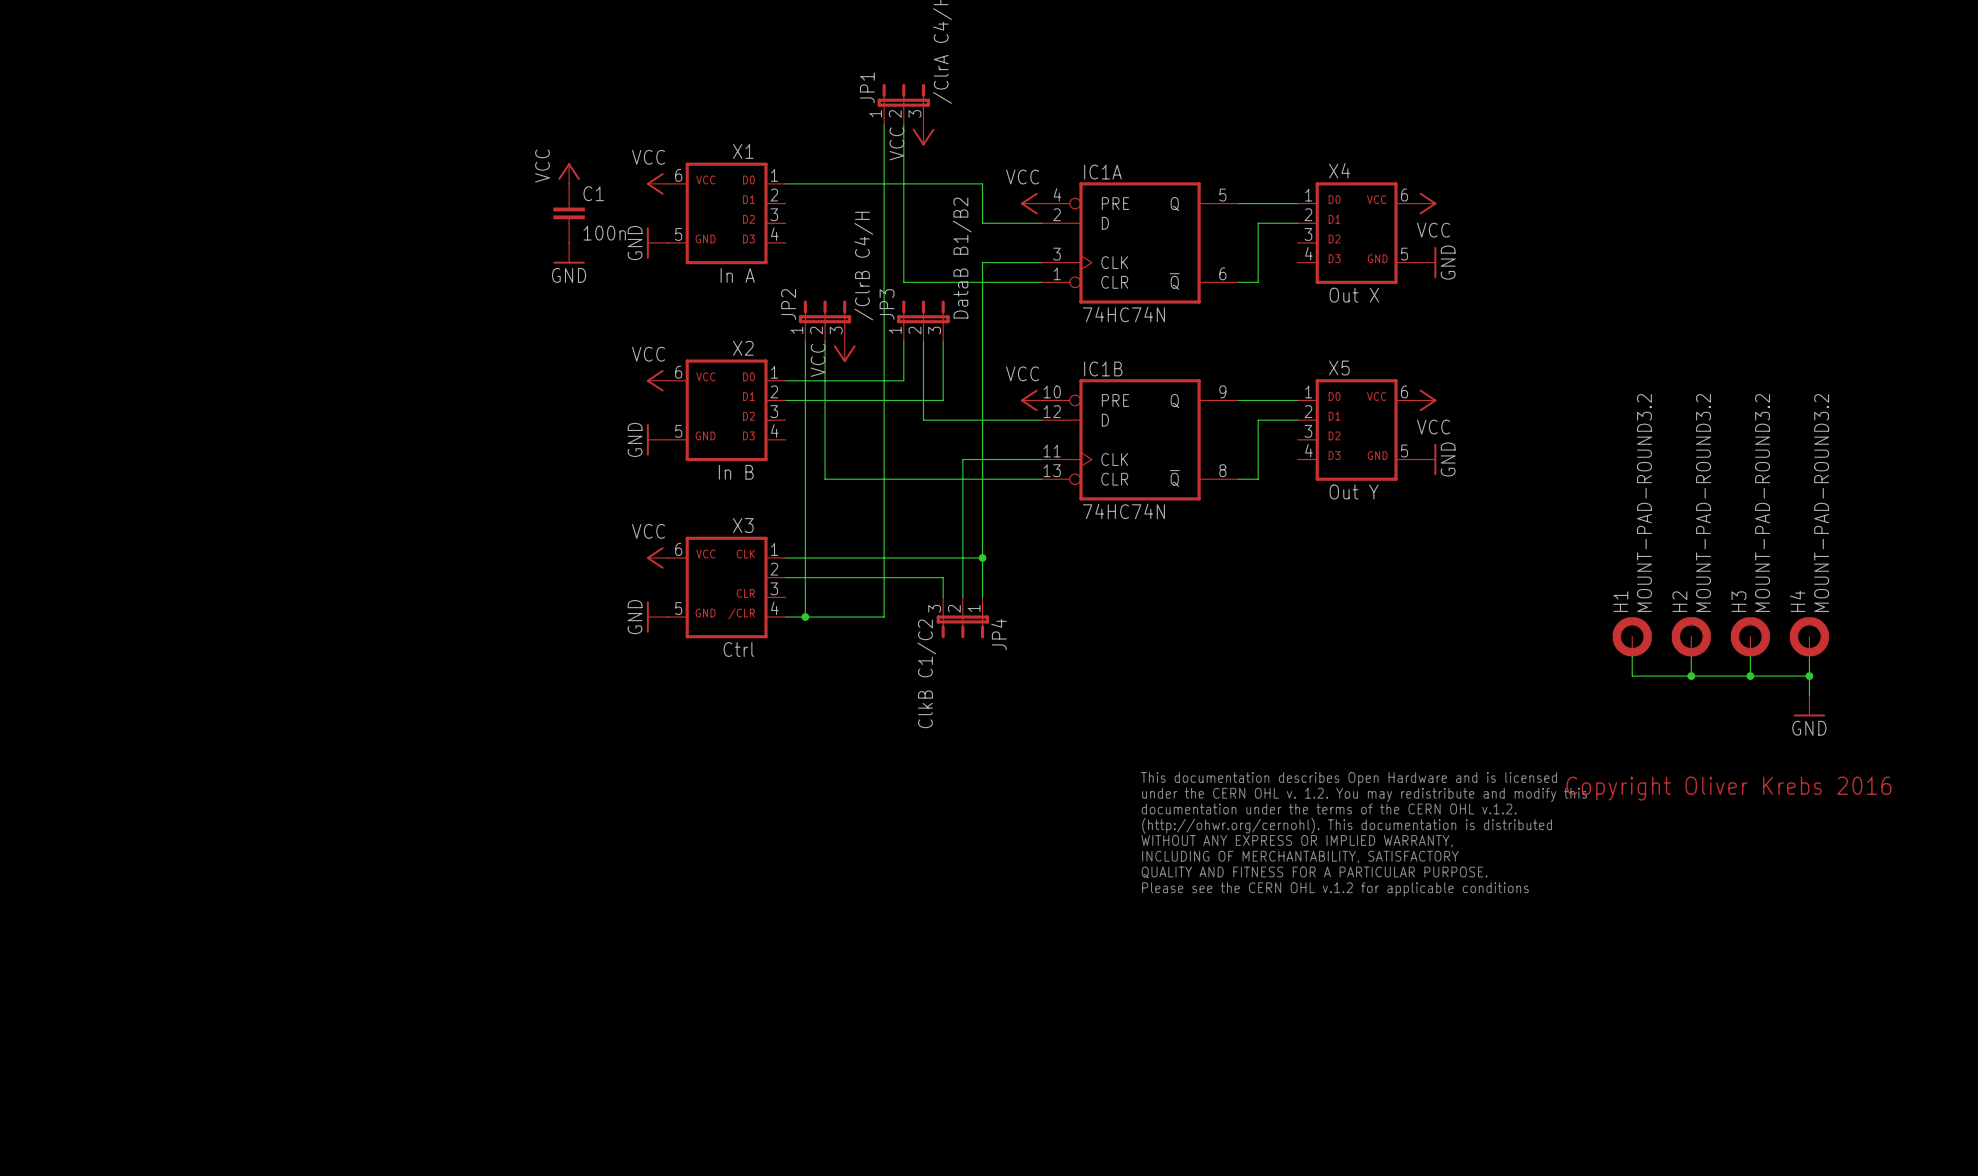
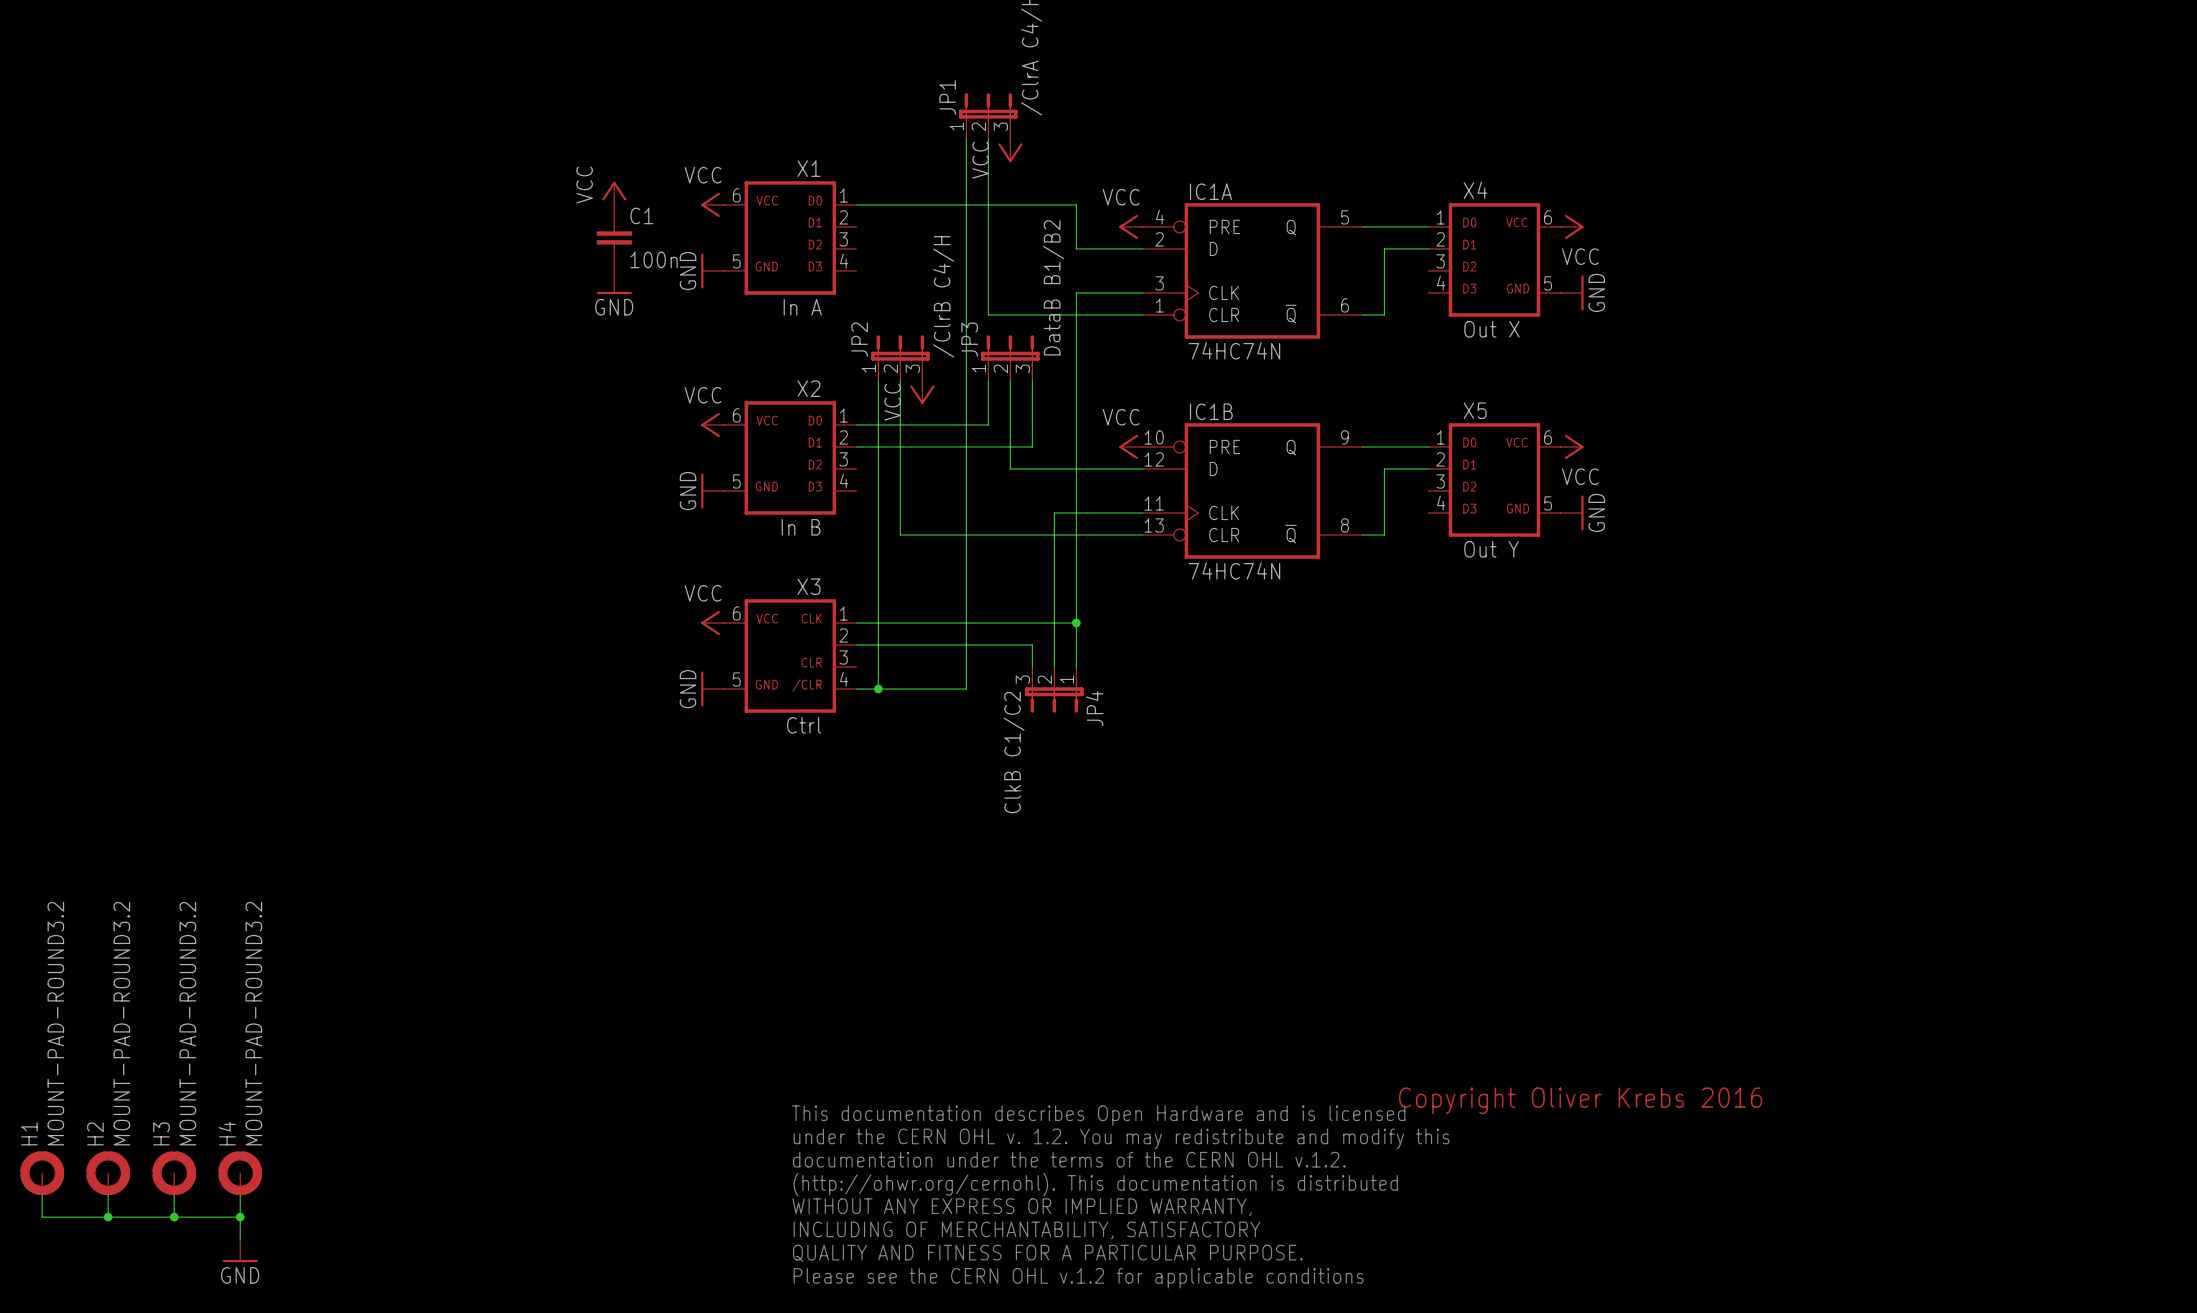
H1 position: (1632, 636) -> (42, 1173)
H2 position: (1691, 636) -> (108, 1173)
H3 position: (1750, 636) -> (174, 1173)
H4 position: (1809, 636) -> (240, 1173)
wire: (1632, 656) (1632, 676) (1809, 676) -> none
wire: (1691, 656) (1691, 676) -> none
wire: (1750, 656) (1750, 676) -> none
wire: (1809, 656) (1809, 695) -> none
junction: (1691, 676) -> none
junction: (1750, 676) -> none
junction: (1809, 676) -> none
power symbol: GND (1809, 706) -> none
text: This documentation describes Open Hardware and is licensed (1348, 779) -> none
text: Copyright Oliver Krebs 2016 (1728, 788) -> none
text: under the CERN OHL v. 1.2. You may redistribute and modify this (1364, 794) -> none
text: documentation under the terms of the CERN OHL v.1.2. (1329, 808) -> none
text: (http://ohwr.org/cernohl). This documentation is distributed (1347, 825) -> none
text: WITHOUT ANY EXPRESS OR IMPLIED WARRANTY, (1297, 841) -> none
text: INCLUDING OF MERCHANTABILITY, SATISFACTORY (1300, 856) -> none
text: QUALITY AND FITNESS FOR A PARTICULAR PURPOSE. (1314, 872) -> none
text: Please see the CERN OHL v.1.2 for applicable conditions (1335, 889) -> none
text: none -> Copyright Oliver Krebs 2016 (1580, 1100)
text: none -> This documentation describes Open Hardware and is licensed (1098, 1115)
text: none -> under the CERN OHL v. 1.2. You may redistribute and modify this (1121, 1138)
text: none -> documentation under the terms of the CERN OHL v.1.2. (1069, 1159)
text: none -> (http://ohwr.org/cernohl). This documentation is distributed (1095, 1184)
wire: none -> (42, 1195) (42, 1217) (240, 1217)
wire: none -> (108, 1195) (108, 1217)
wire: none -> (174, 1195) (174, 1217)
wire: none -> (240, 1195) (240, 1239)
text: none -> WITHOUT ANY EXPRESS OR IMPLIED WARRANTY, (1022, 1207)
junction: none -> (108, 1217)
junction: none -> (174, 1217)
junction: none -> (240, 1217)
text: none -> INCLUDING OF MERCHANTABILITY, SATISFACTORY (1026, 1230)
power symbol: none -> GND (240, 1250)
text: none -> QUALITY AND FITNESS FOR A PARTICULAR PURPOSE. (1047, 1253)
text: none -> Please see the CERN OHL v.1.2 for applicable conditions (1078, 1278)

